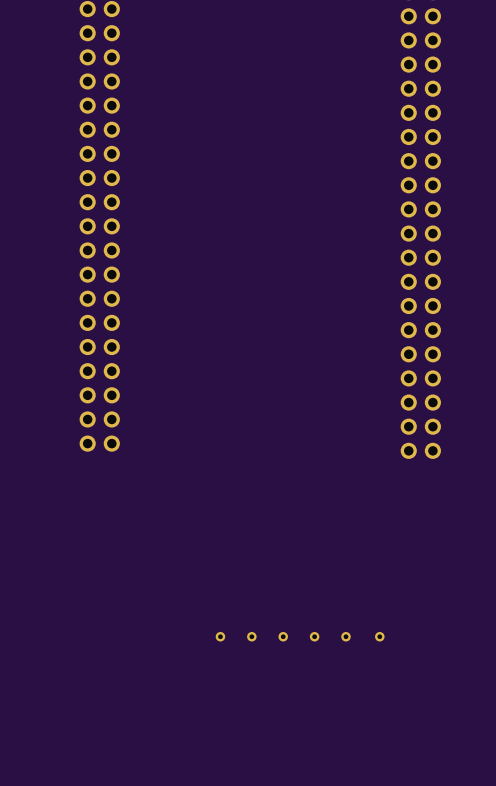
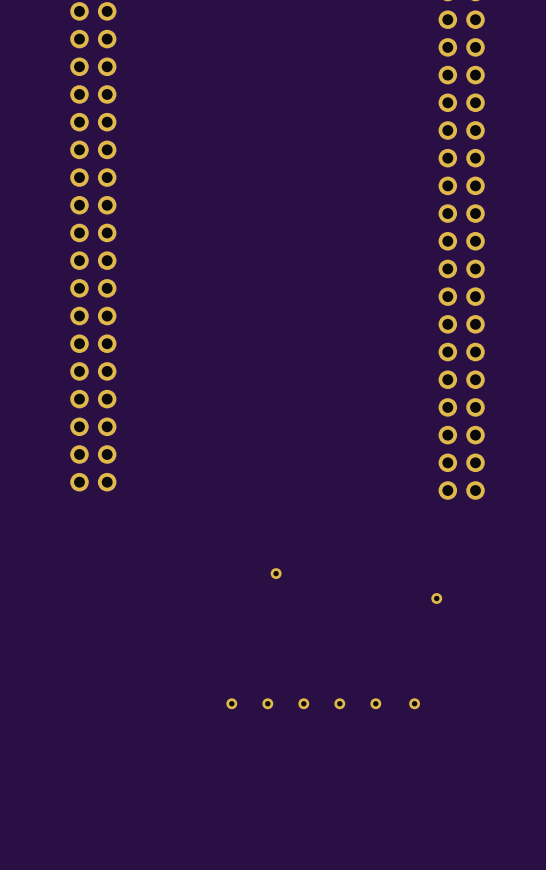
part: none -> (276, 573)
part: none -> (436, 598)

